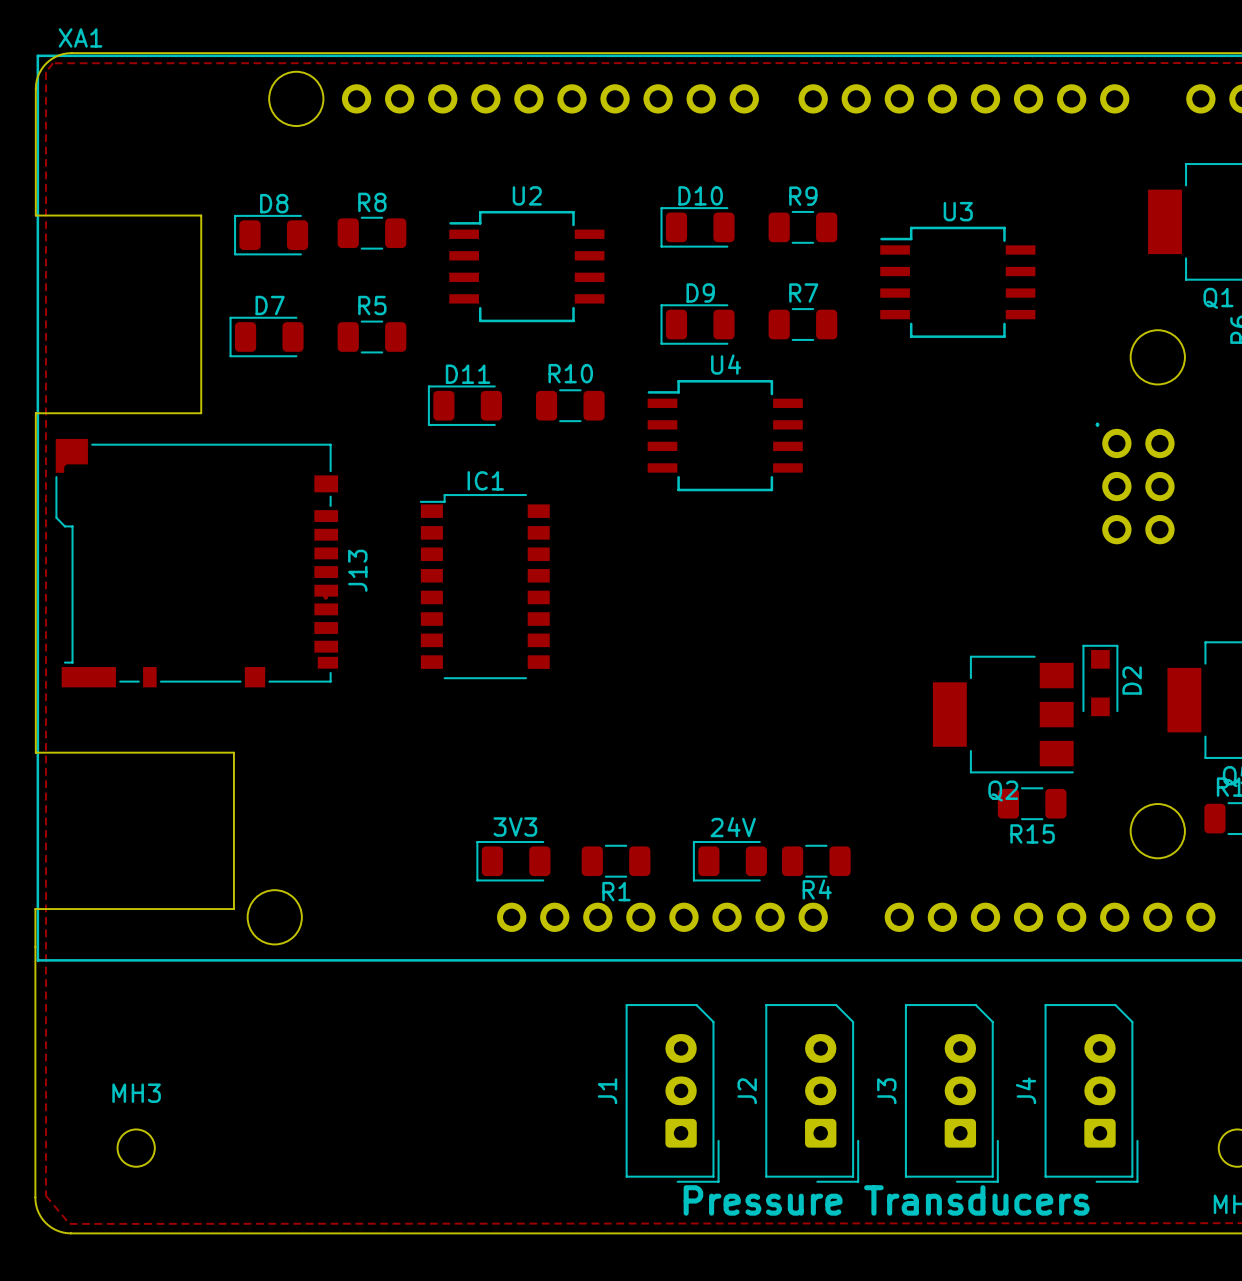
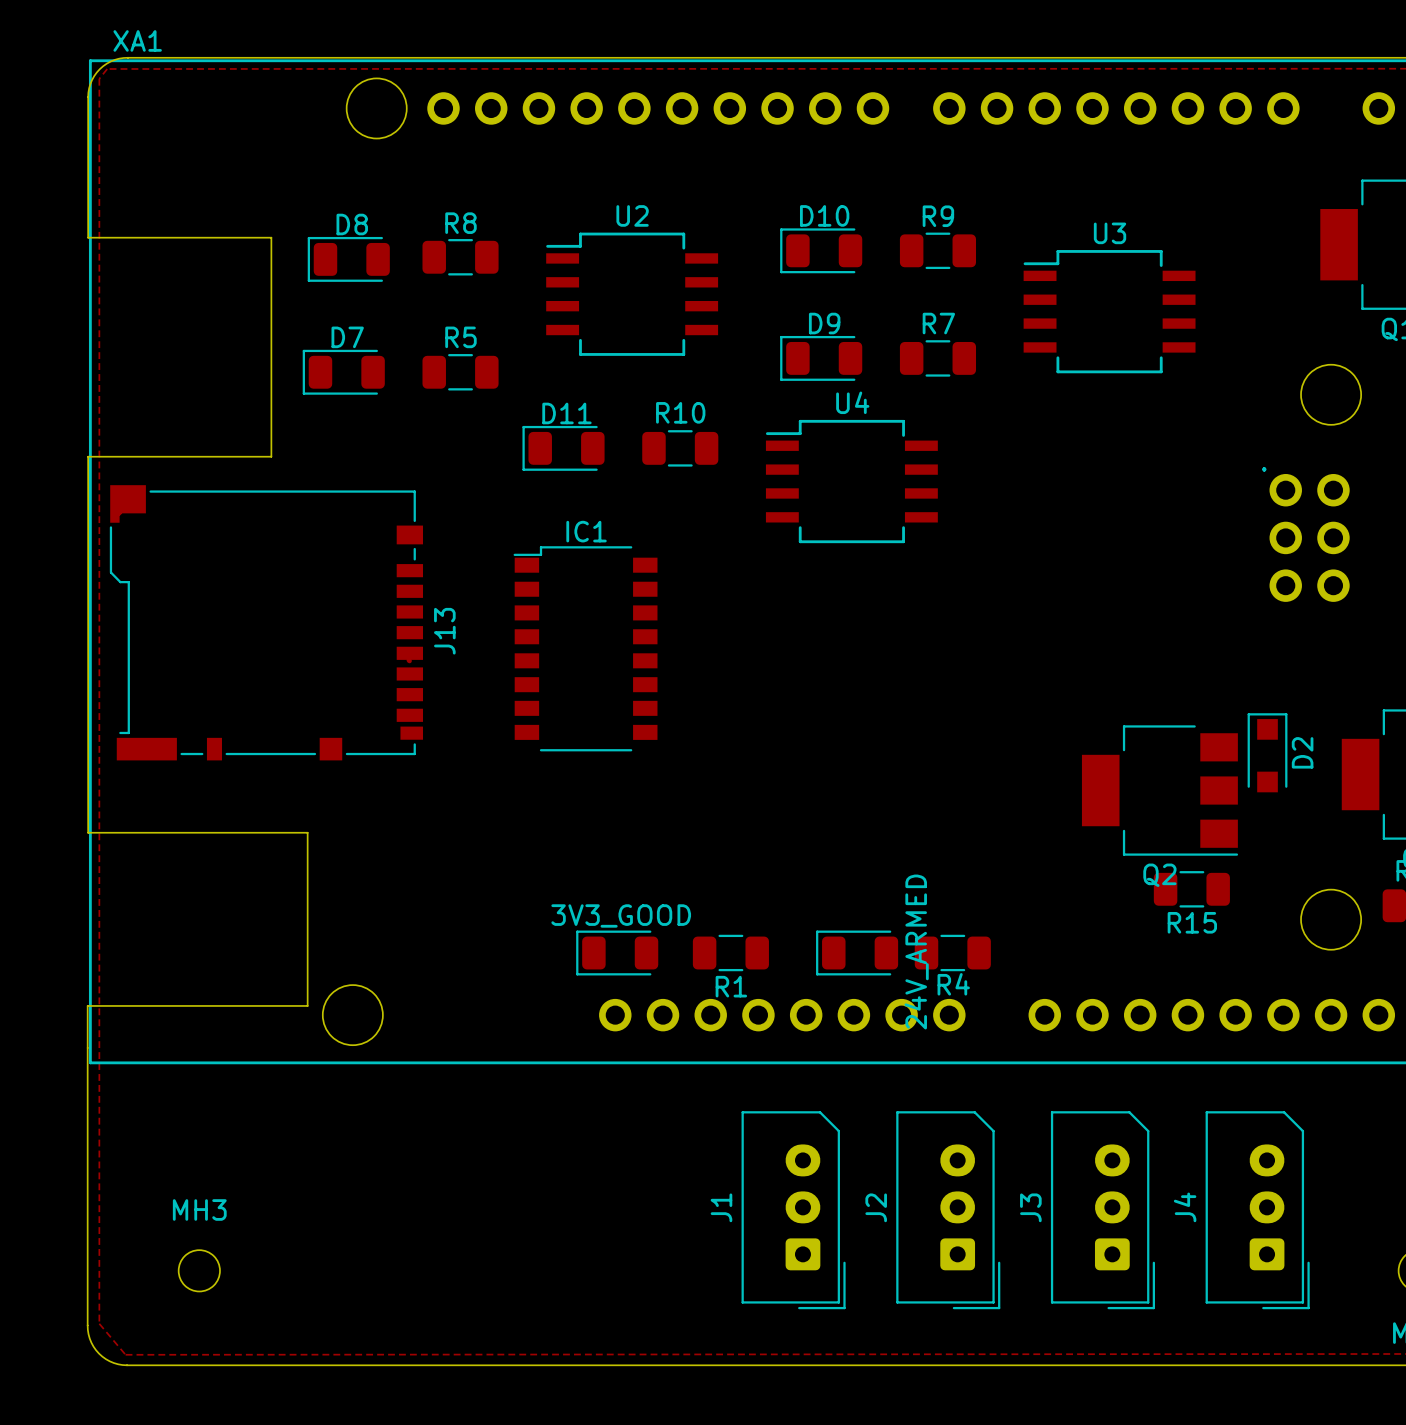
part value: 3V3 (515, 826) -> 3V3_GOOD (621, 915)
part value: 24V (733, 827) -> 24V_ARMED (916, 952)
text: Pressure Transducers (886, 1200) -> none

